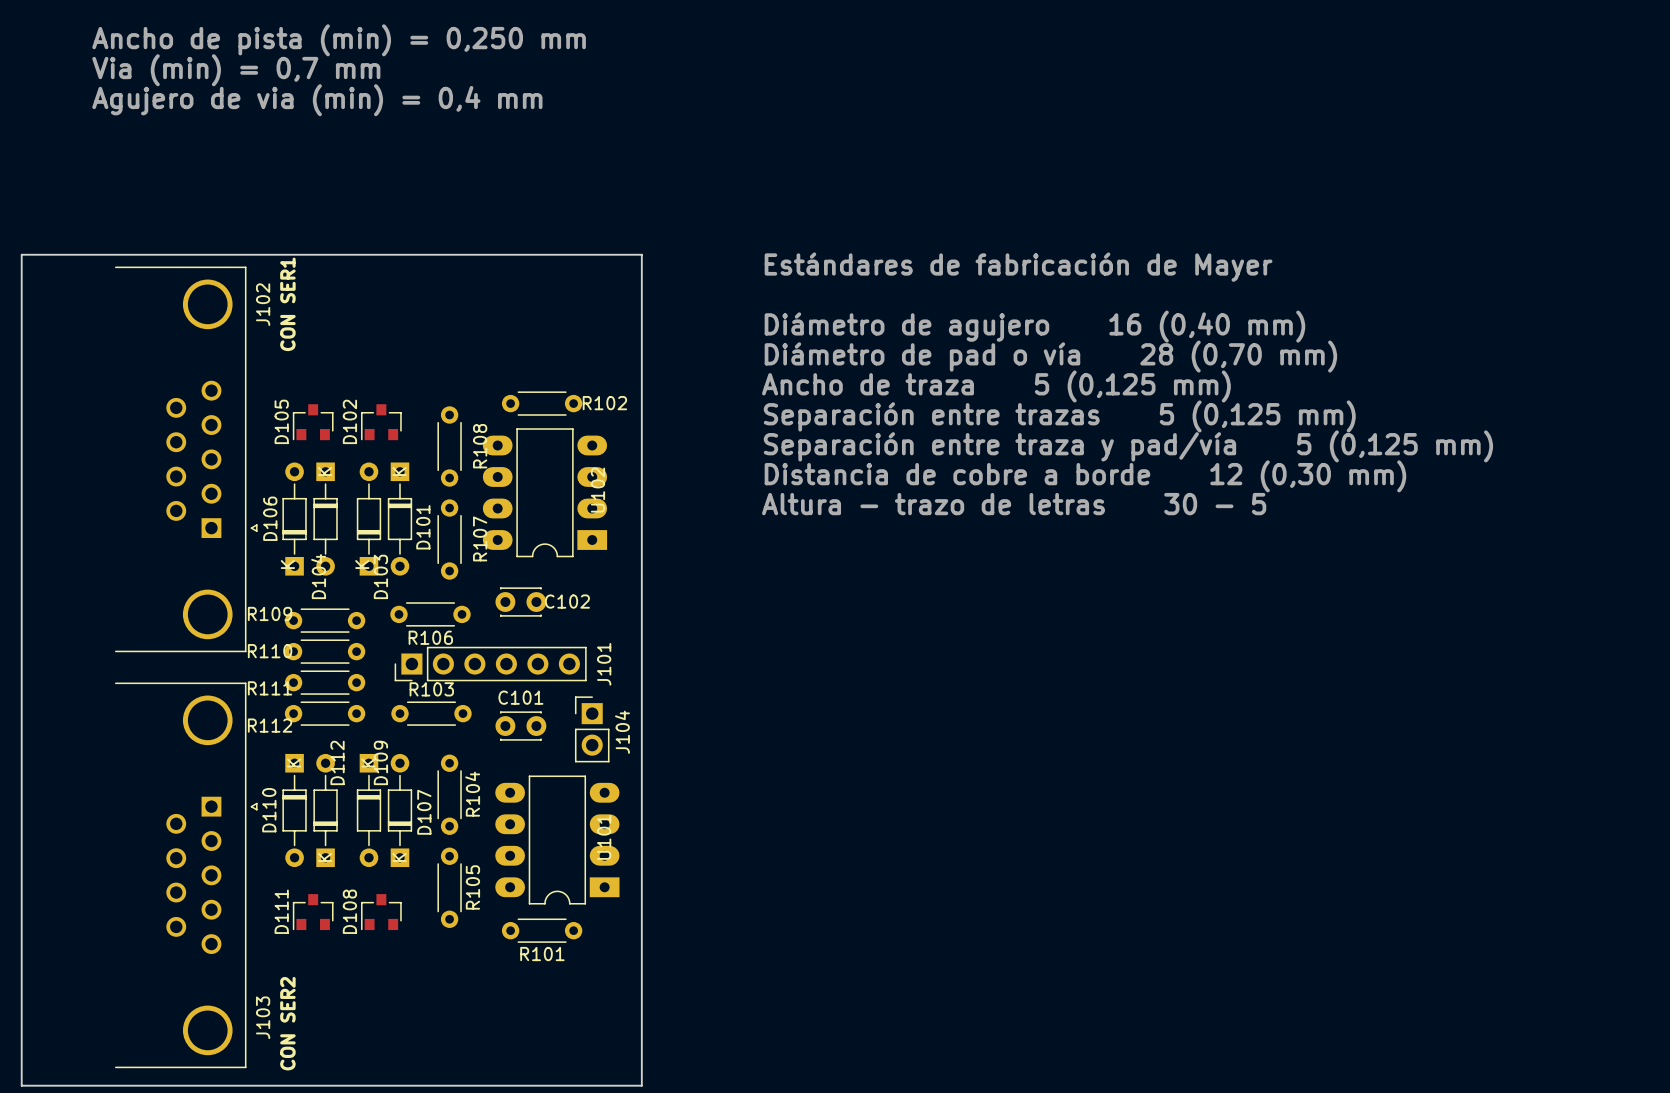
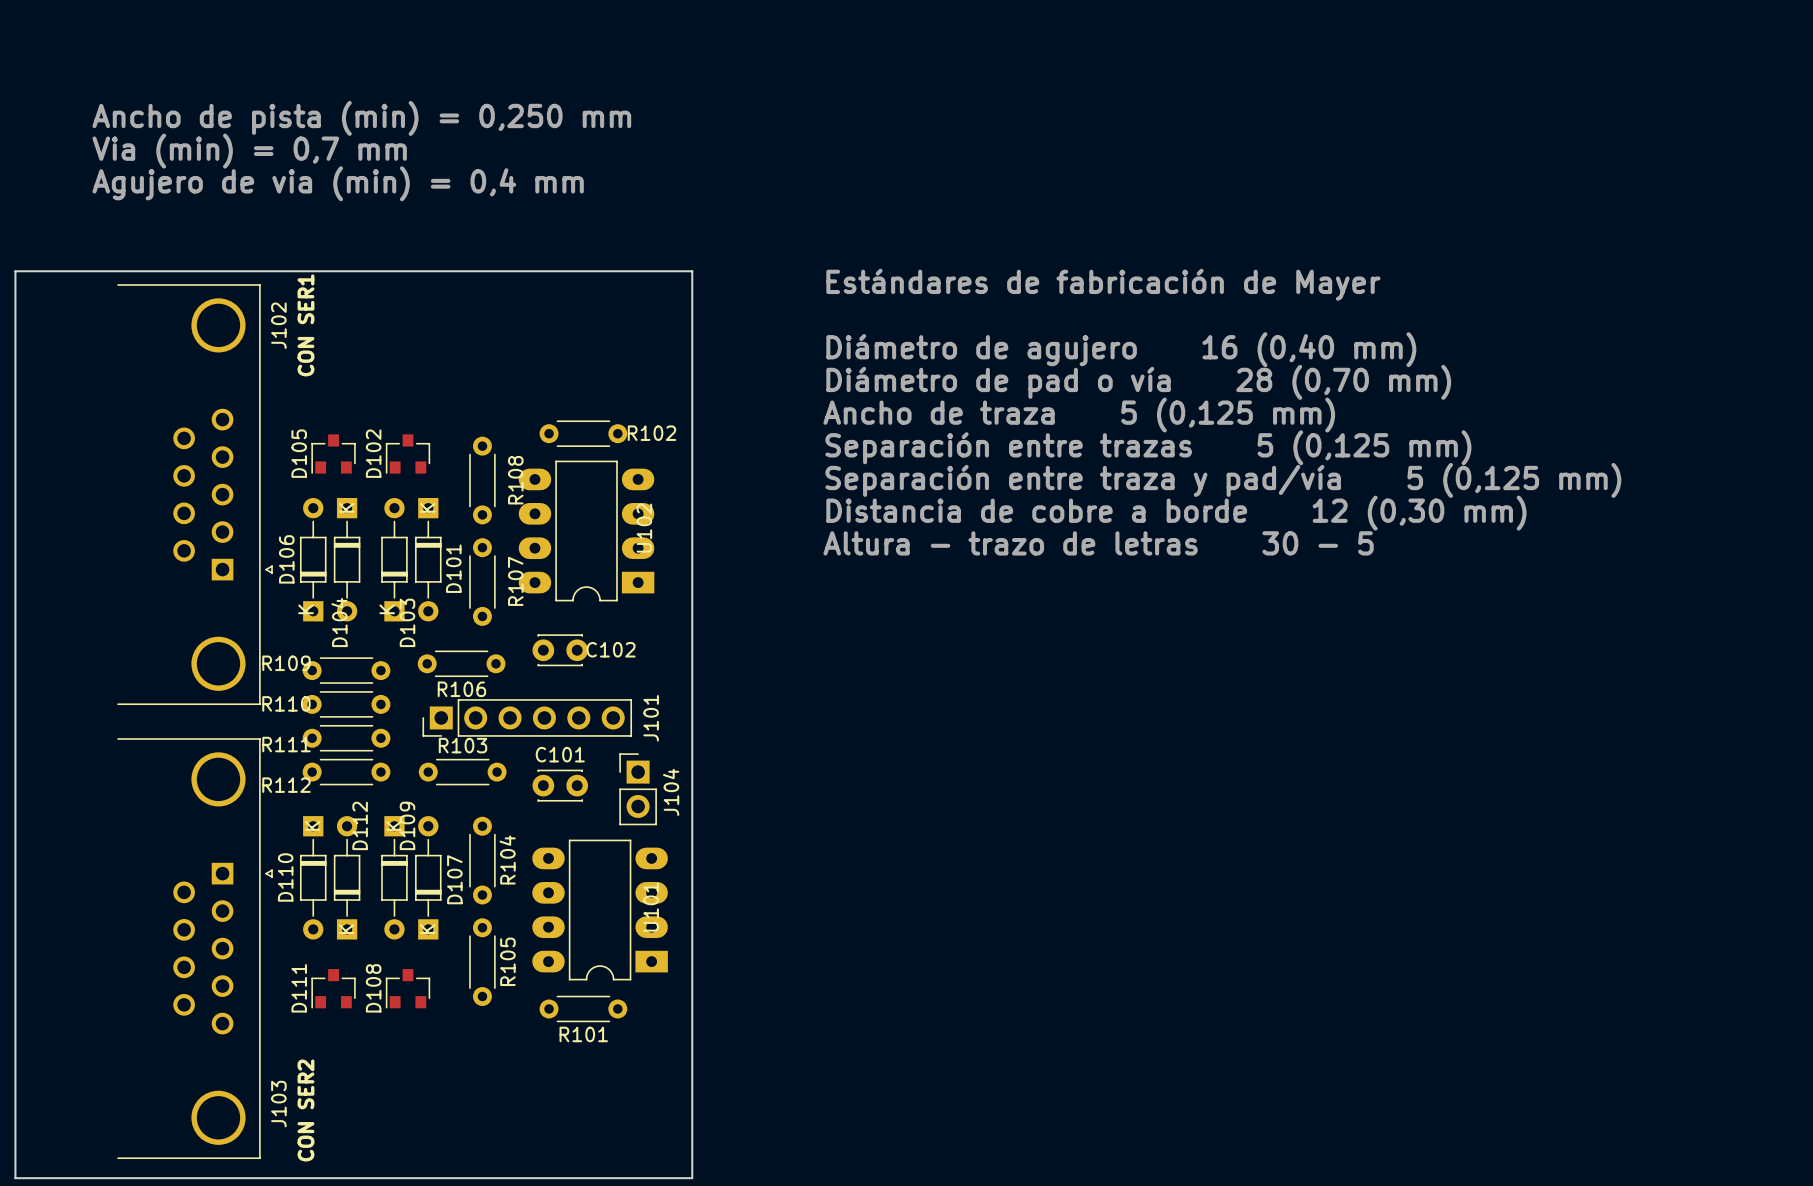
text position: Ancho de pista (min) = 0,250 mm (339, 40) -> Ancho de pista (min) = 0,250 mm (361, 118)
text position: Via (min) = 0,7 mm (236, 70) -> Via (min) = 0,7 mm (249, 151)
text position: Agujero de via (min) = 0,4 mm (317, 100) -> Agujero de via (min) = 0,4 mm (338, 183)

